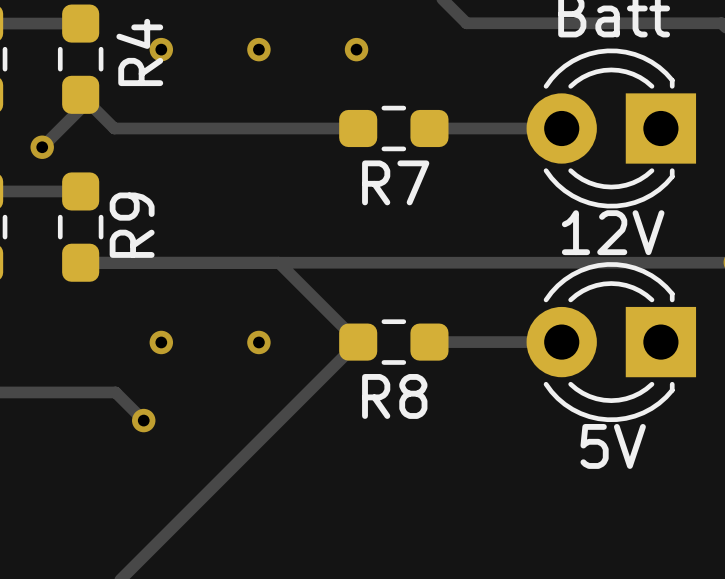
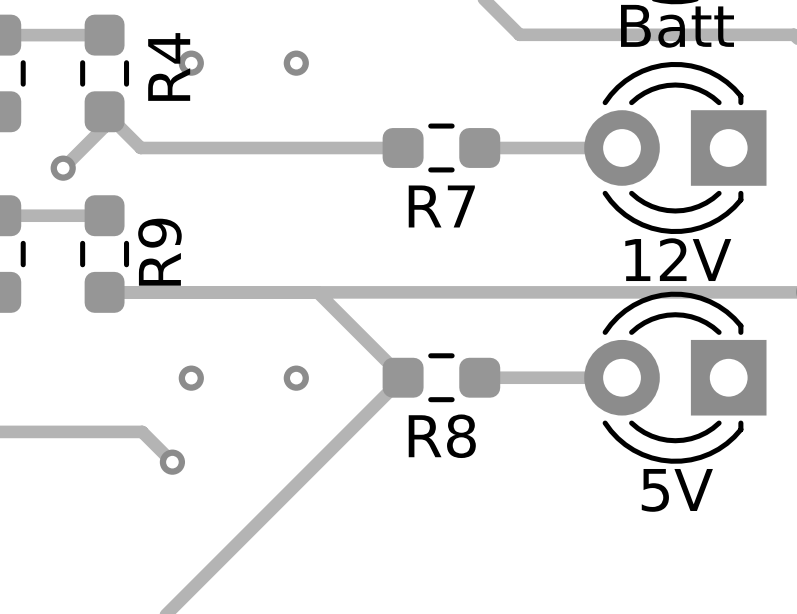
via: (356, 49) -> none

